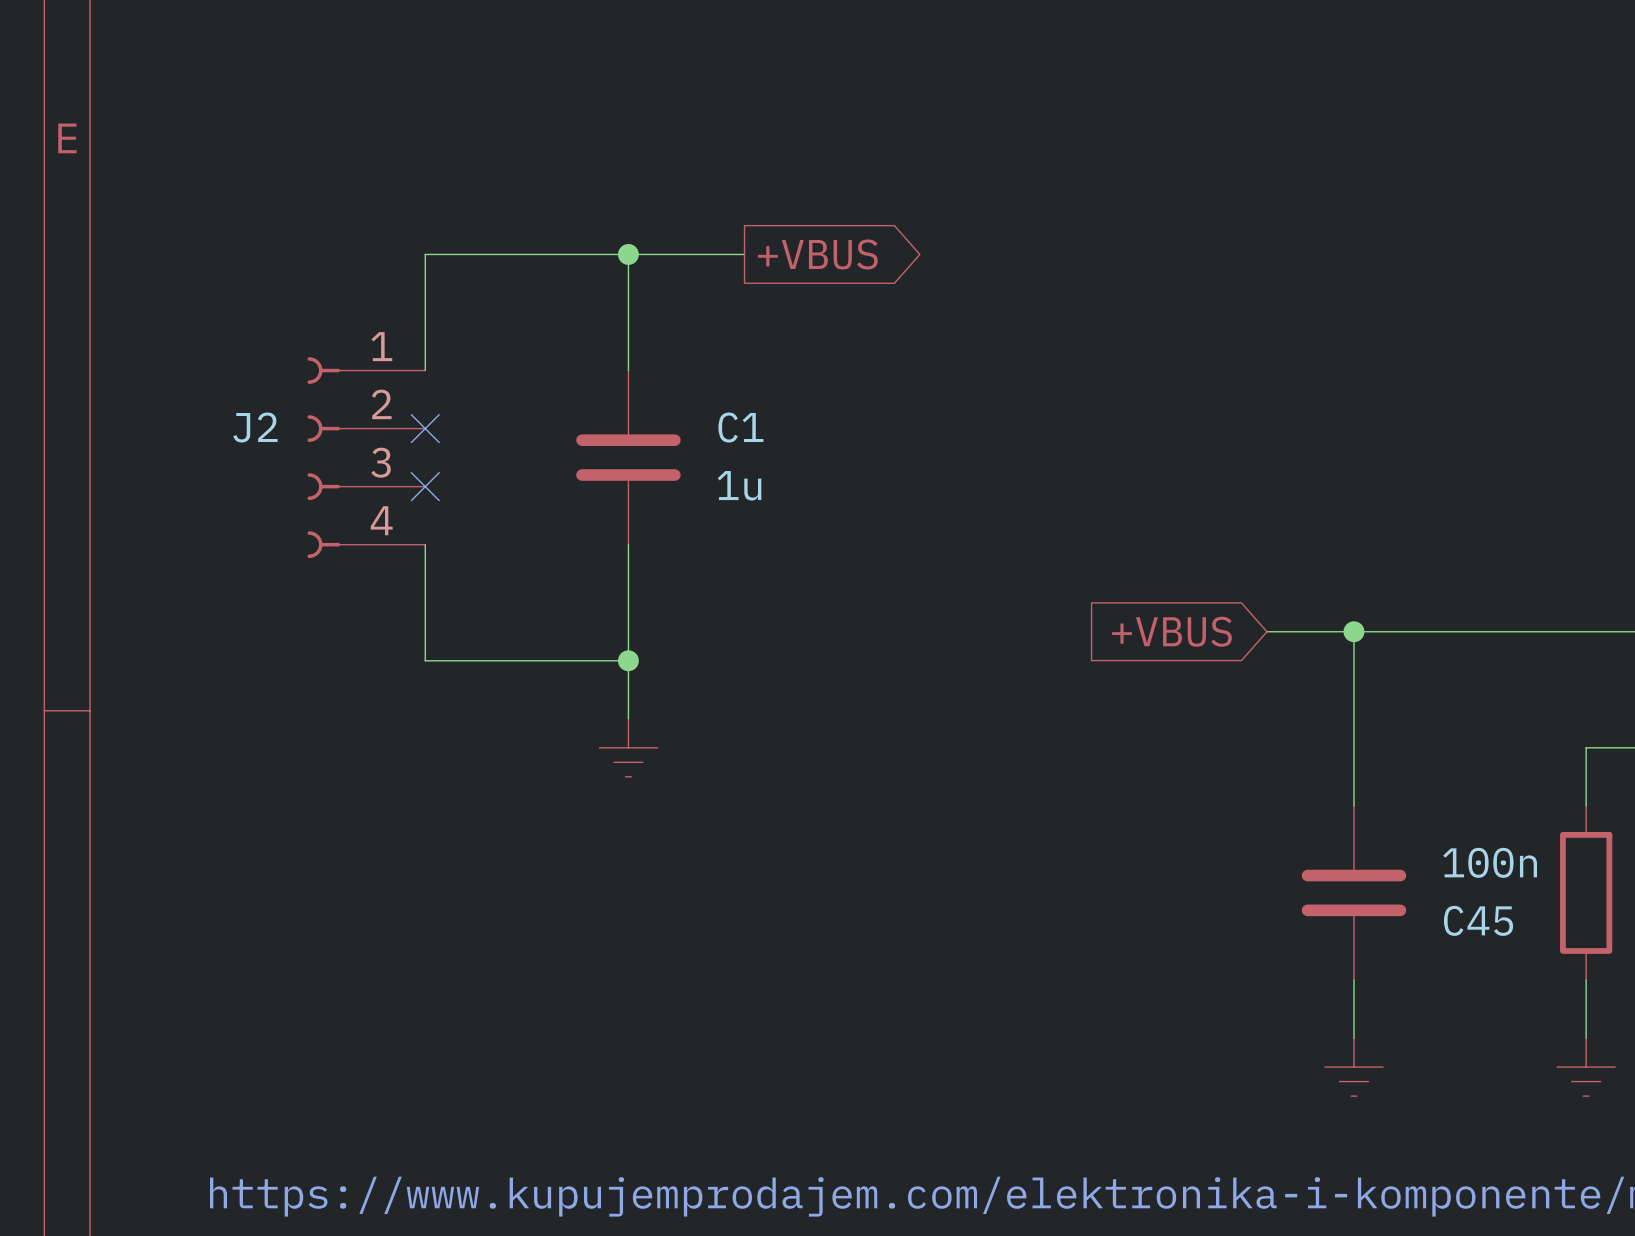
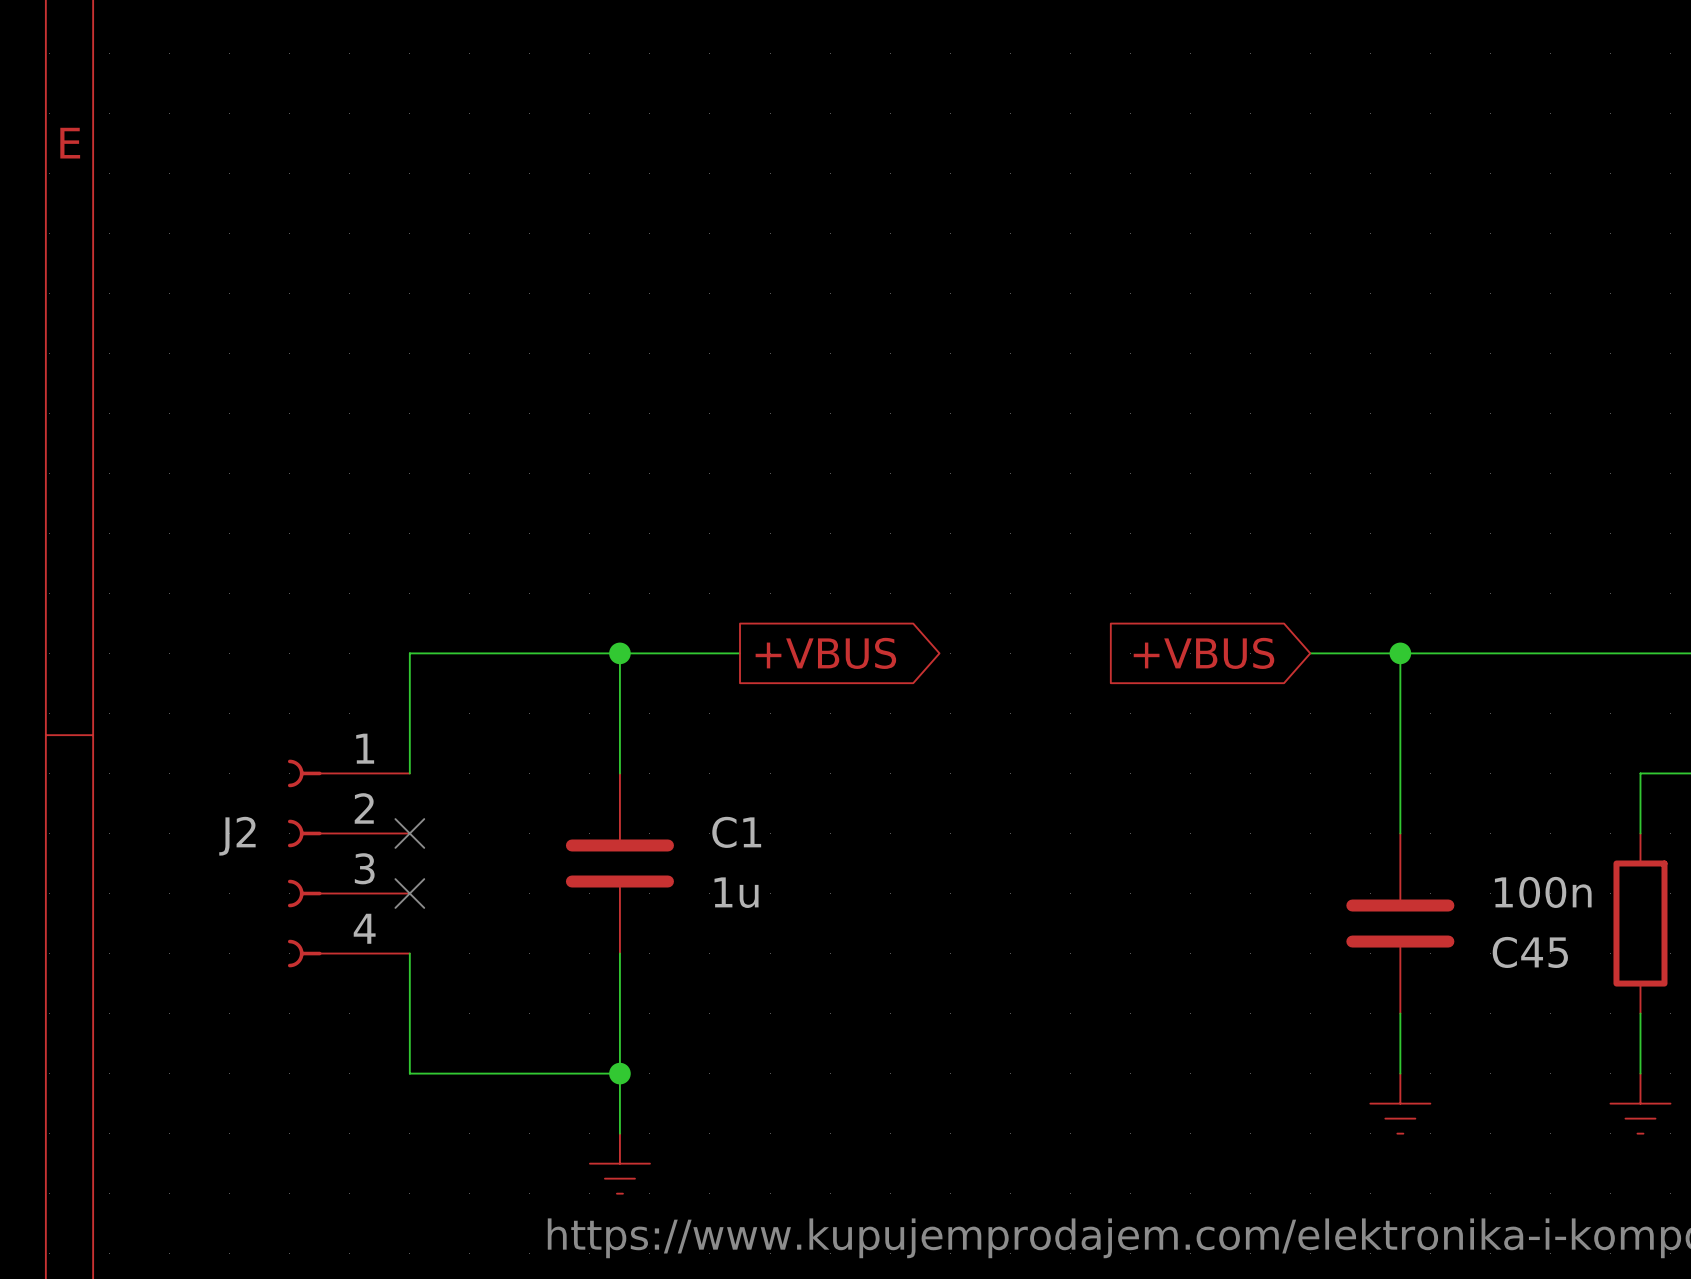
wire: (628, 254) (628, 370) -> (619, 653) (619, 773)
junction: (628, 254) -> none
wire: (744, 254) (425, 254) (425, 370) -> (740, 653) (409, 653) (409, 773)
global label position: +VBUS (817, 254) -> +VBUS (825, 653)
no-connect mark: (425, 428) -> none
J2 position: (366, 457) -> (348, 863)
C1 position: (628, 457) -> (619, 863)
no-connect mark: (425, 486) -> none
wire: (425, 544) (425, 660) (628, 660) -> (409, 953) (409, 1073) (619, 1073)
wire: (628, 544) (628, 718) -> (619, 953) (619, 1133)
junction position: (628, 660) -> (619, 653)
power symbol position: (628, 747) -> (619, 1163)
no-connect mark: none -> (409, 833)
no-connect mark: none -> (409, 893)
junction: none -> (619, 1073)

